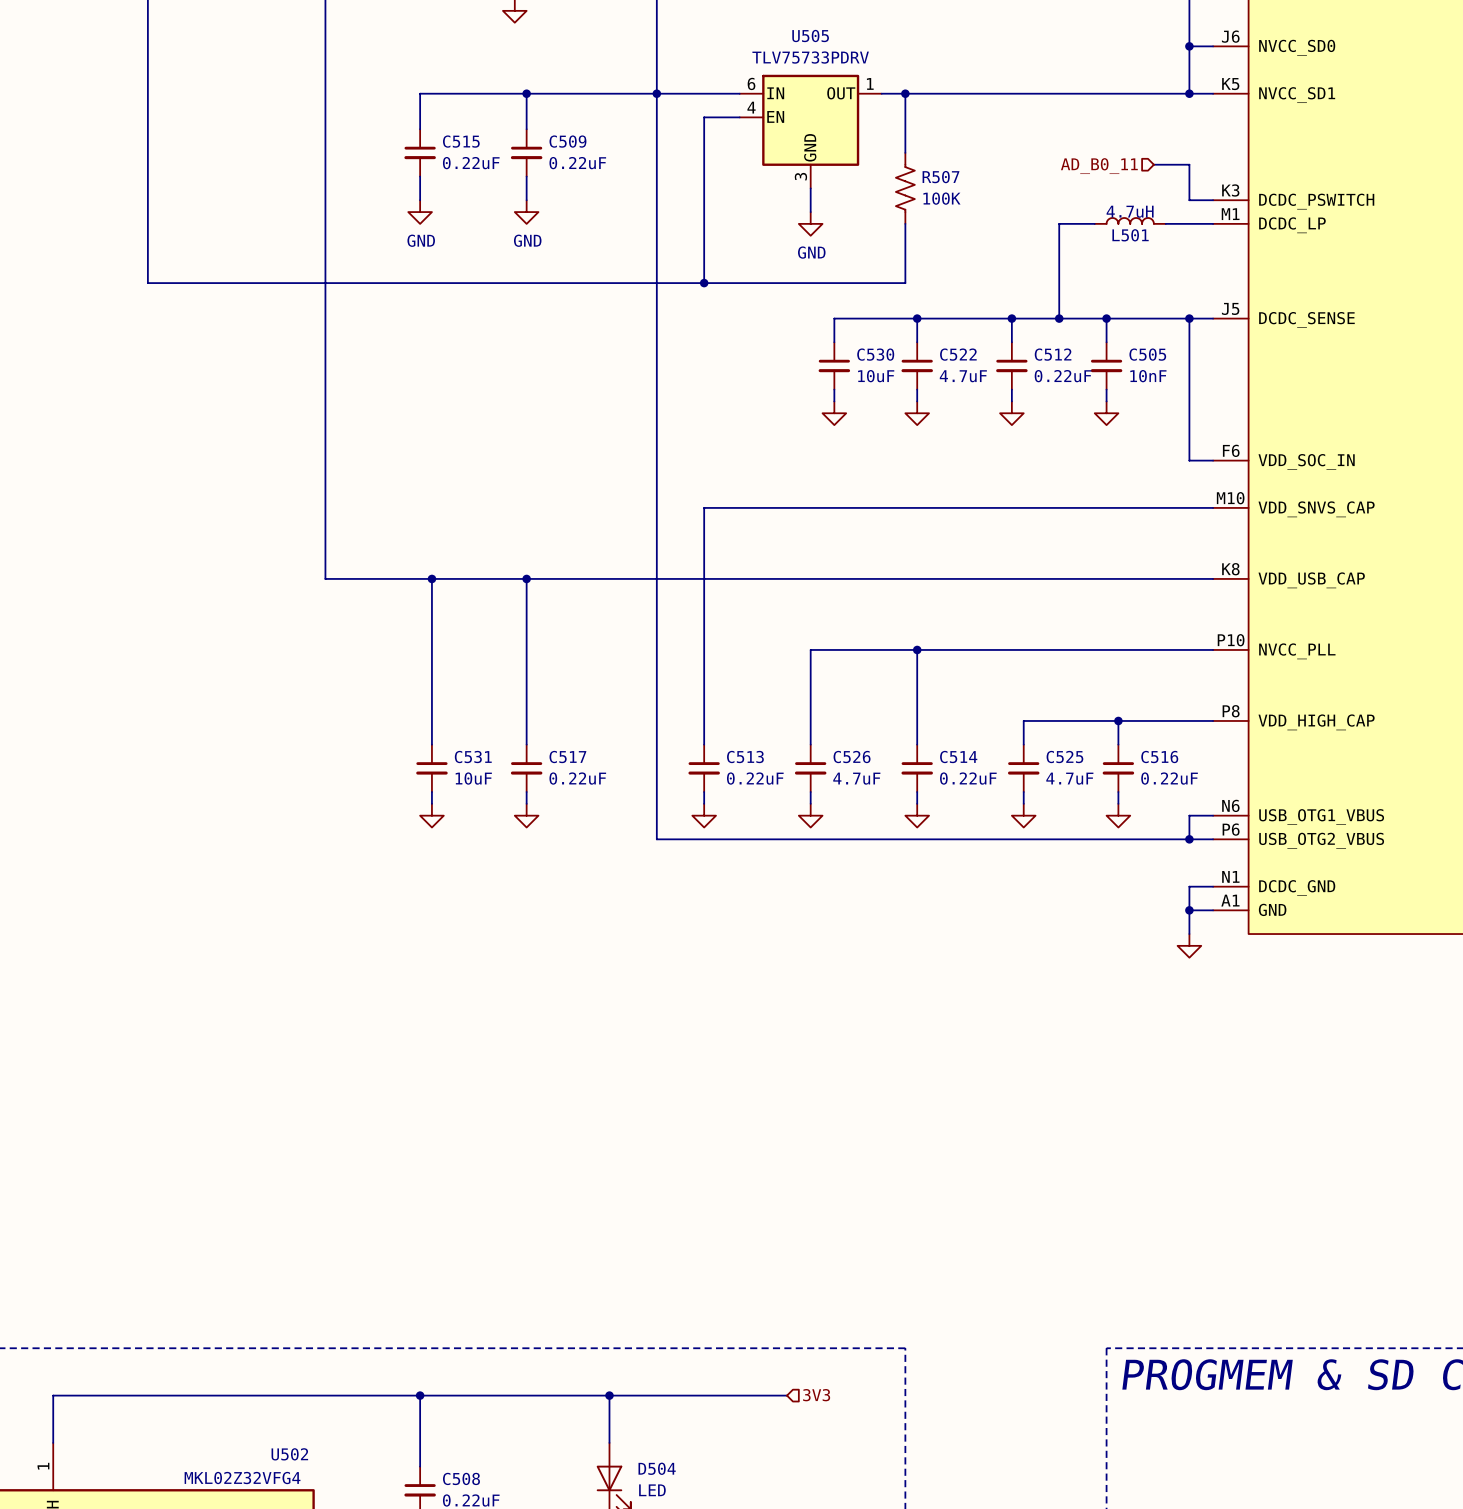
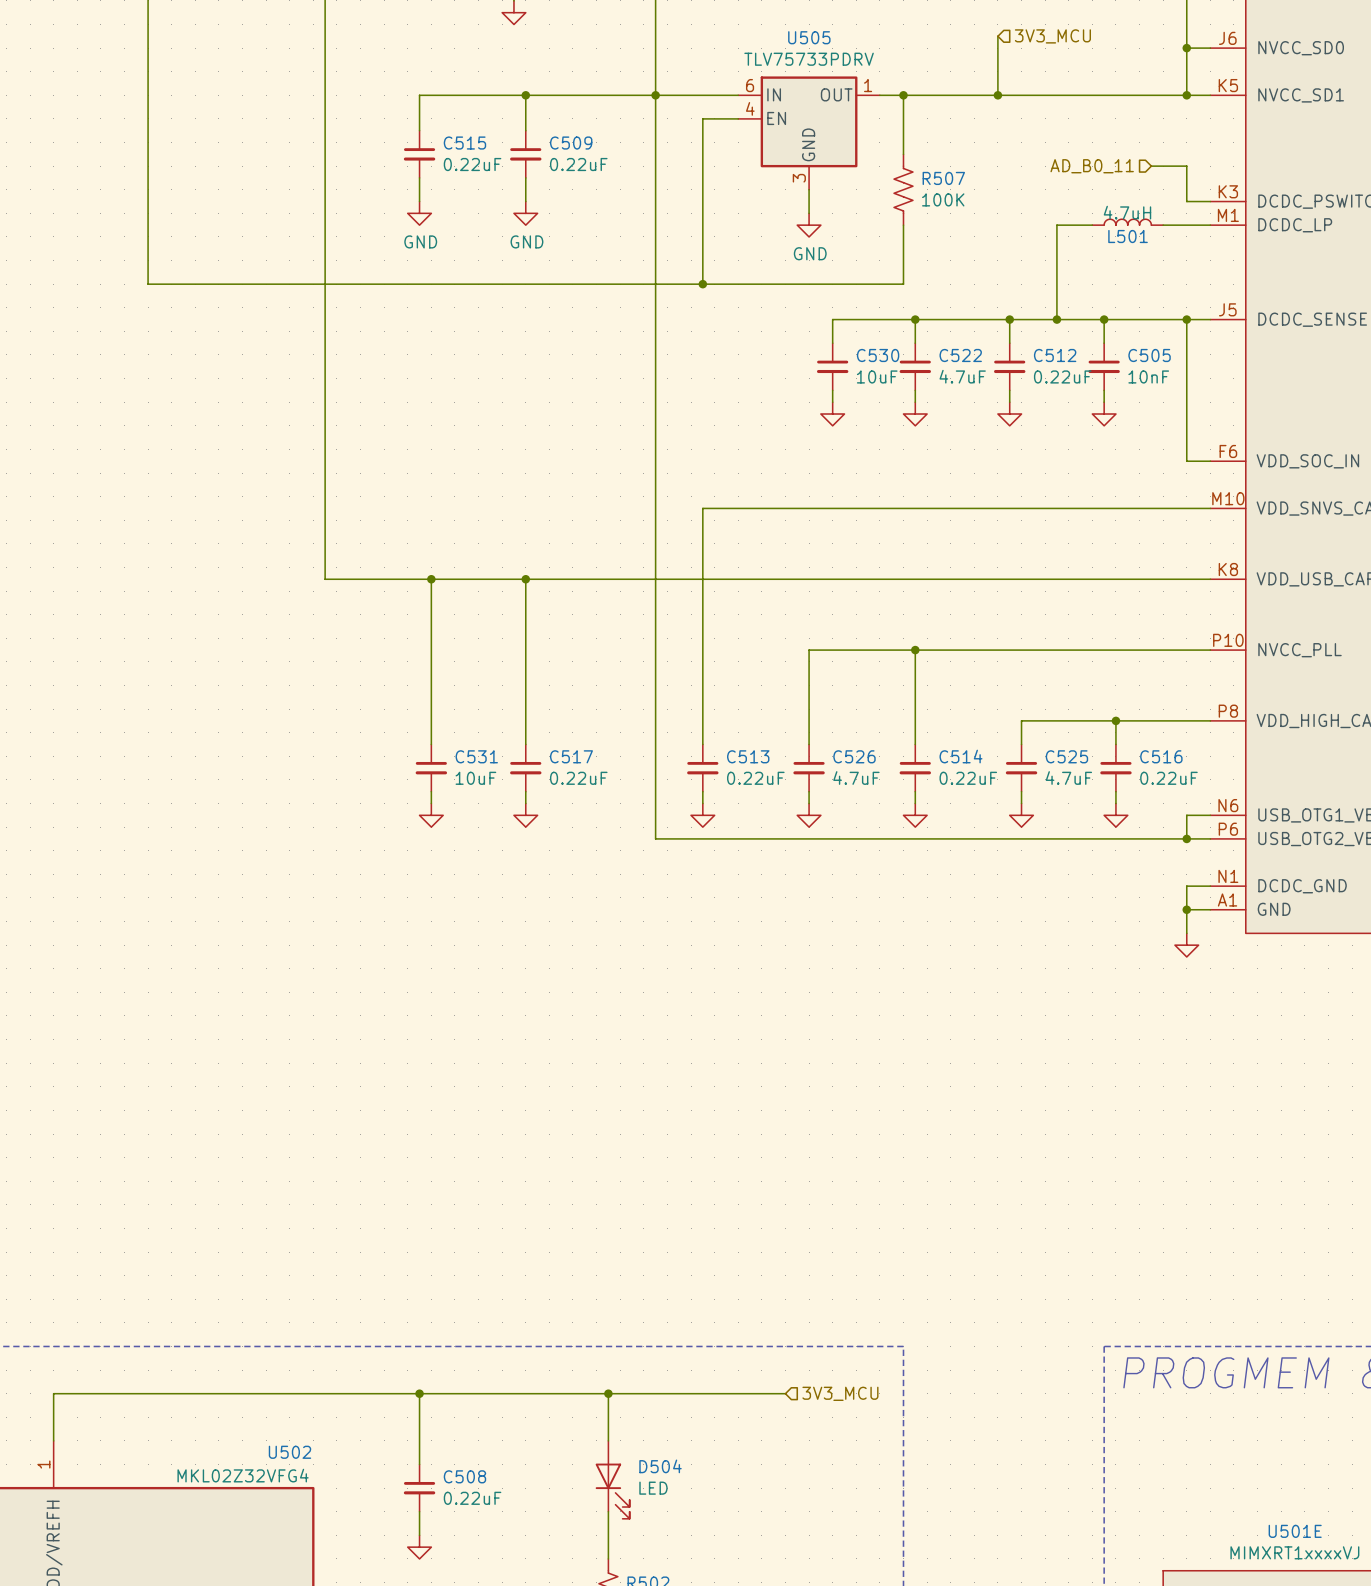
wire: none -> (997, 36) (997, 95)
hierarchical label: none -> 3V3_MCU (1052, 36)
junction: none -> (997, 95)
hierarchical label: 3V3 (816, 1395) -> 3V3_MCU (840, 1393)

